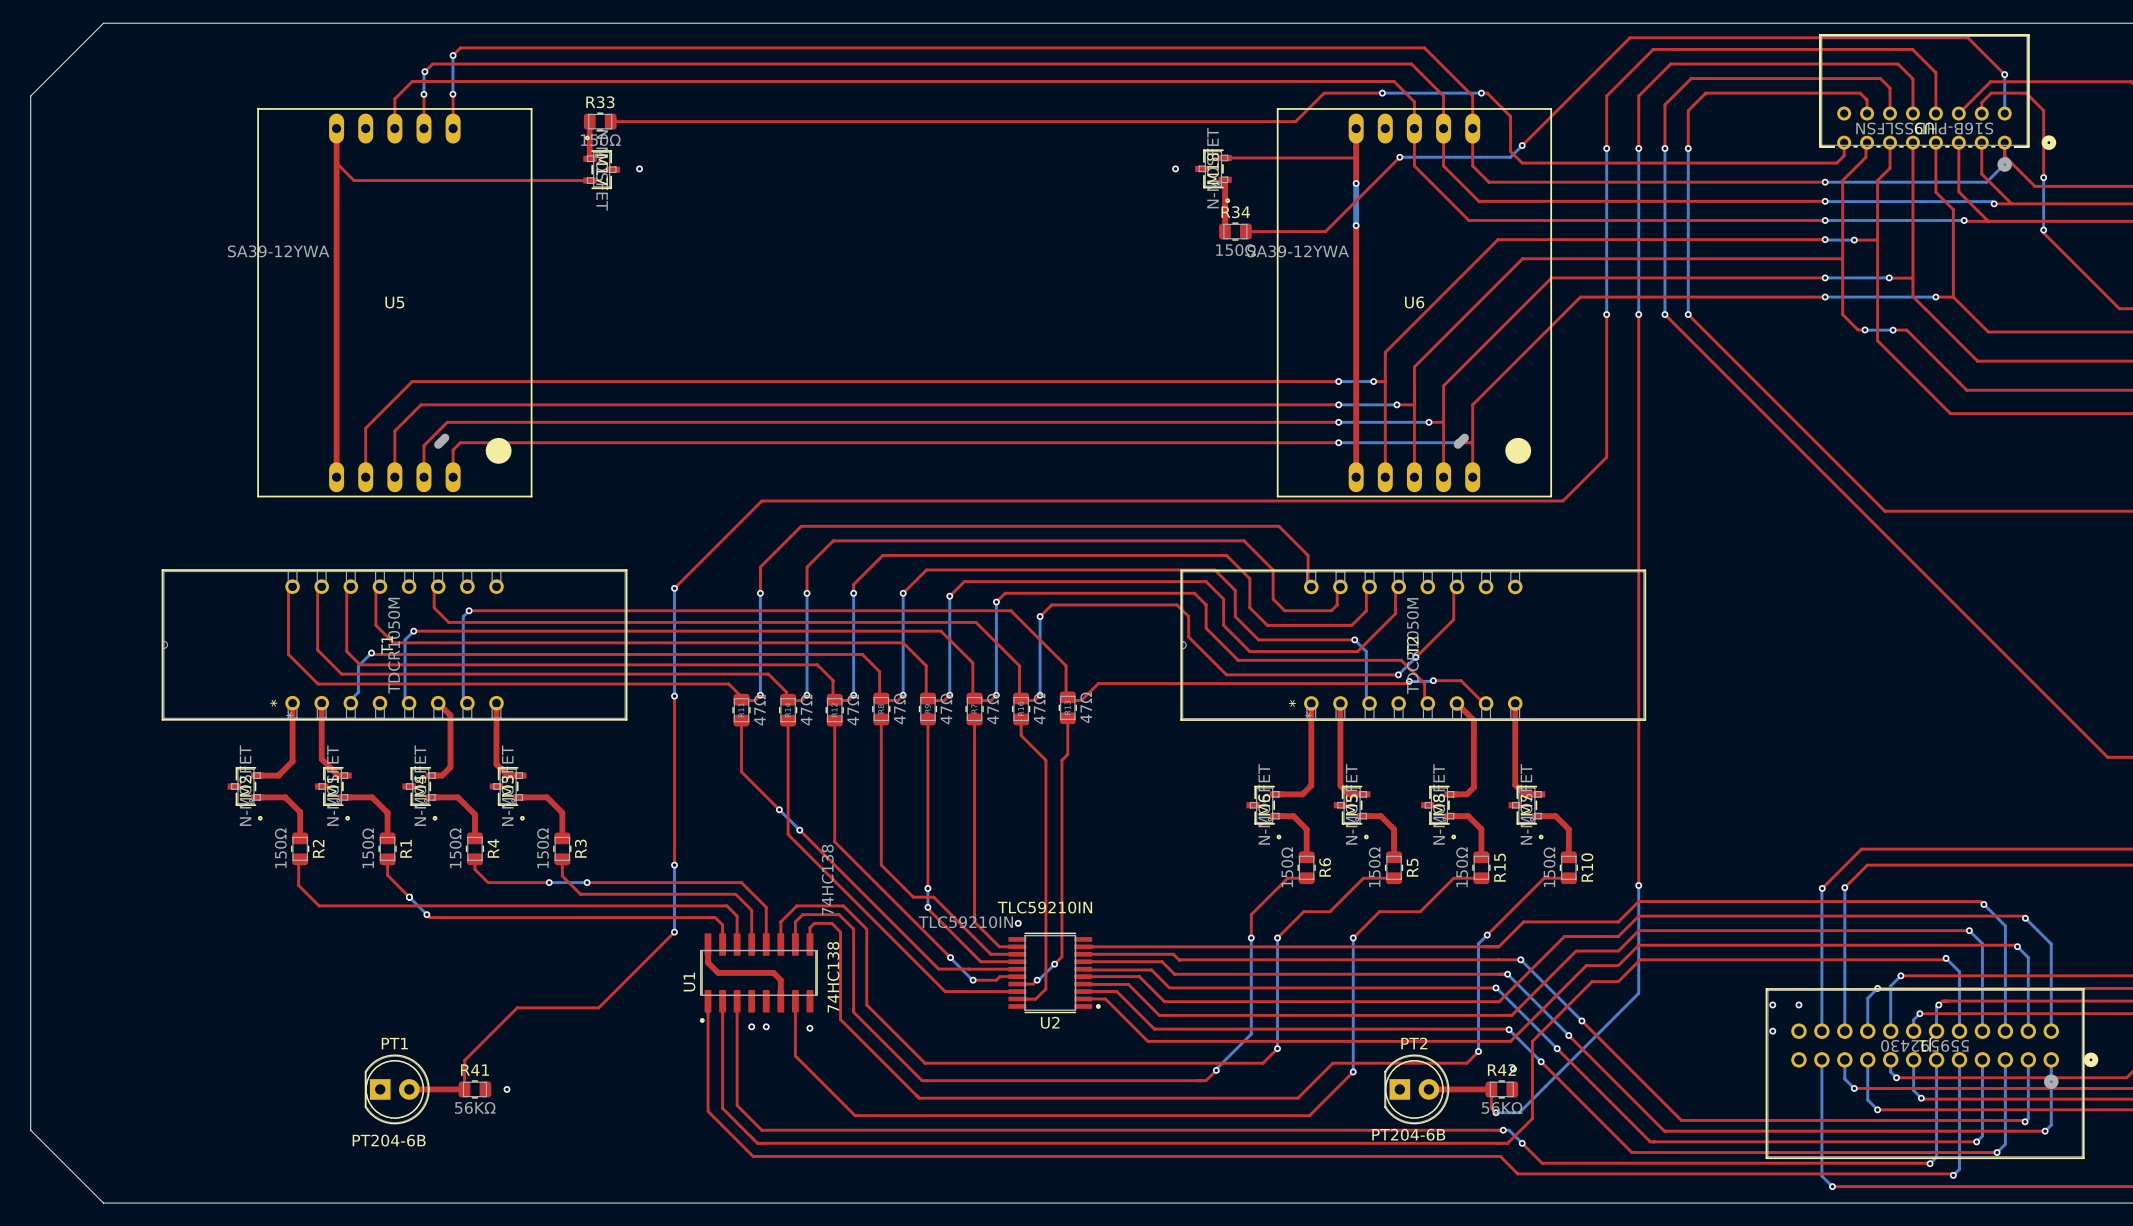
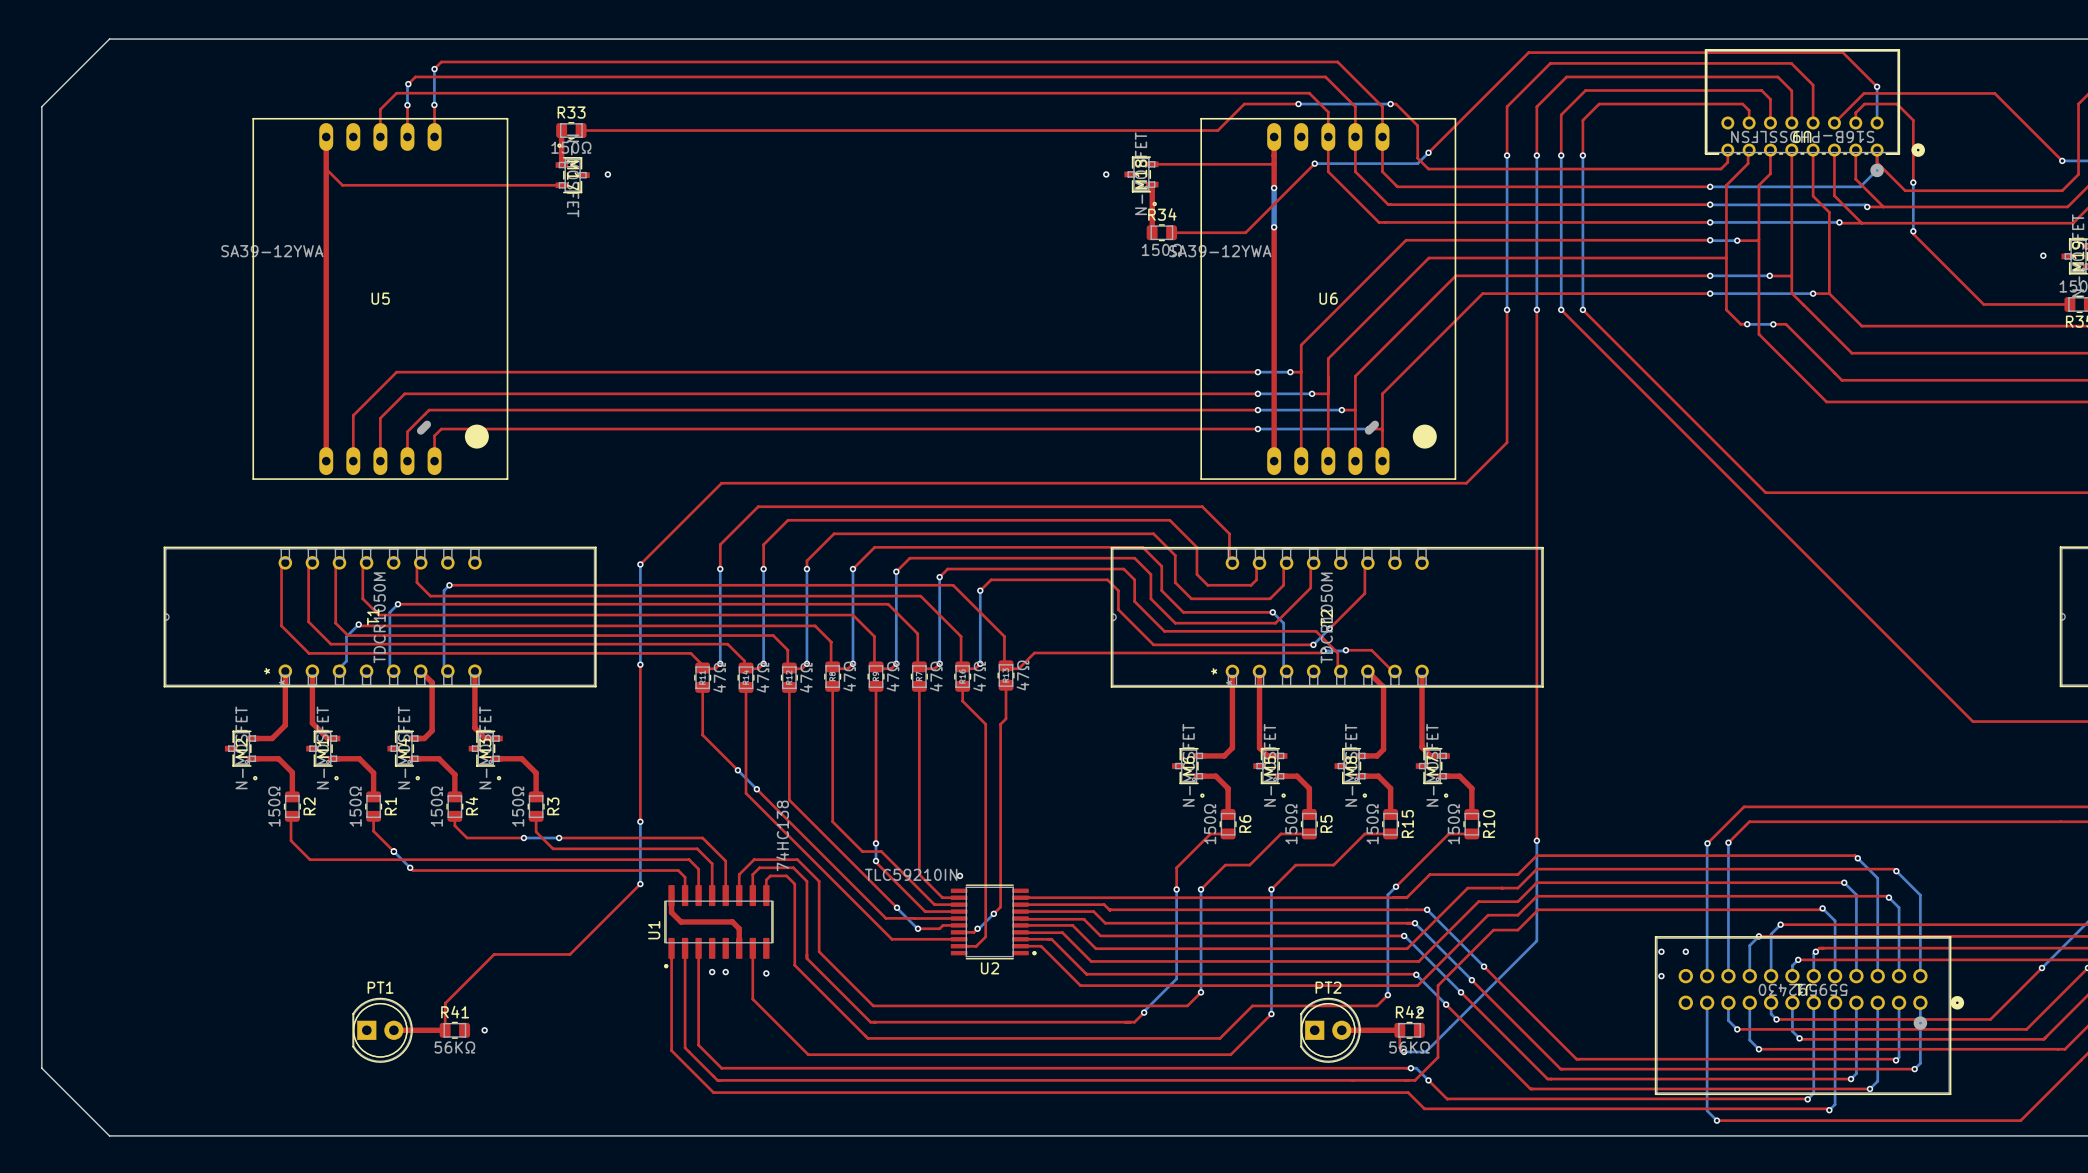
text: TLC59210IN (1044, 907) -> none
text: 74HC138 (833, 977) -> none
text: PT204-6B (1408, 1134) -> none
text: PT204-6B (389, 1140) -> none

